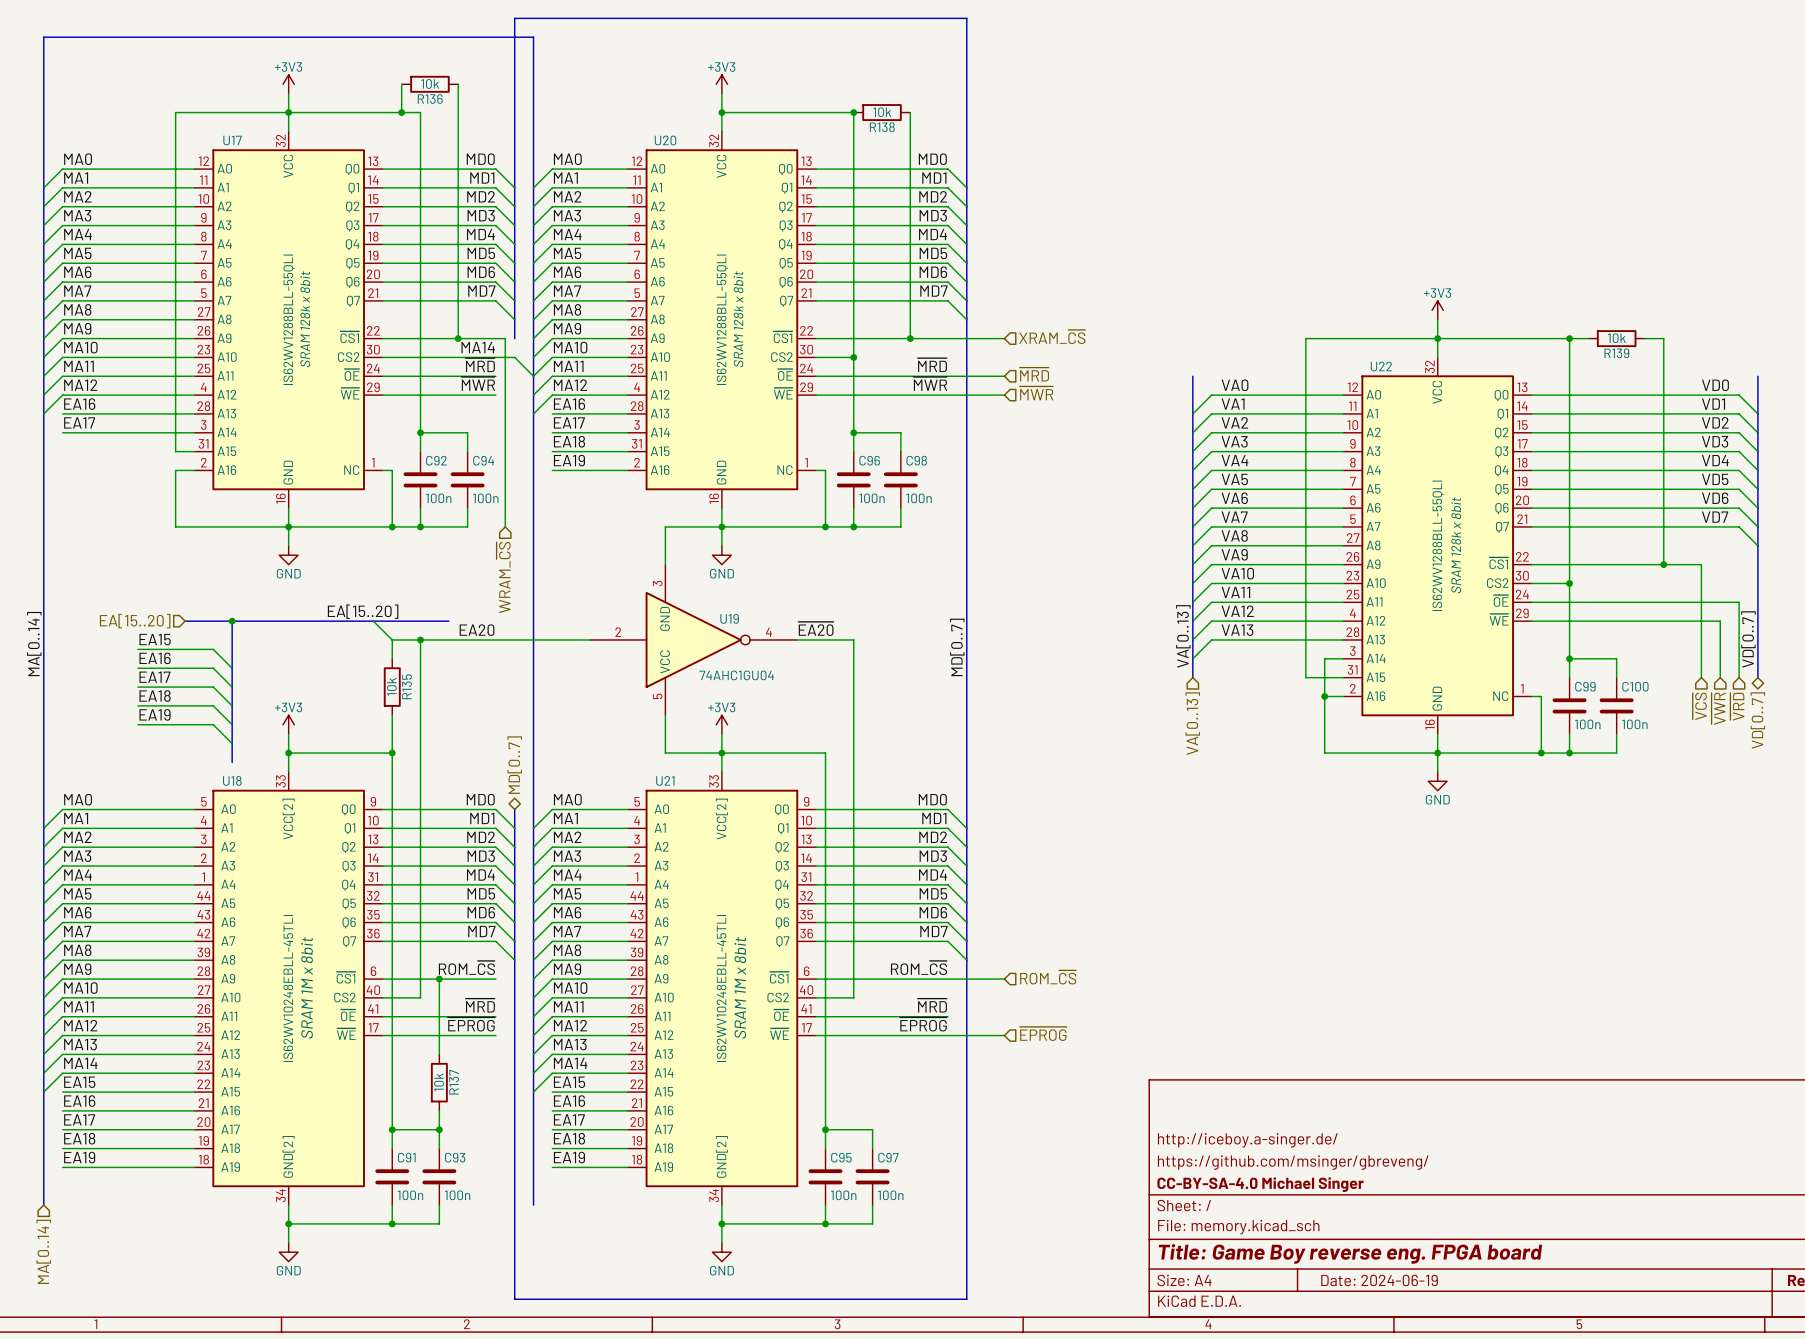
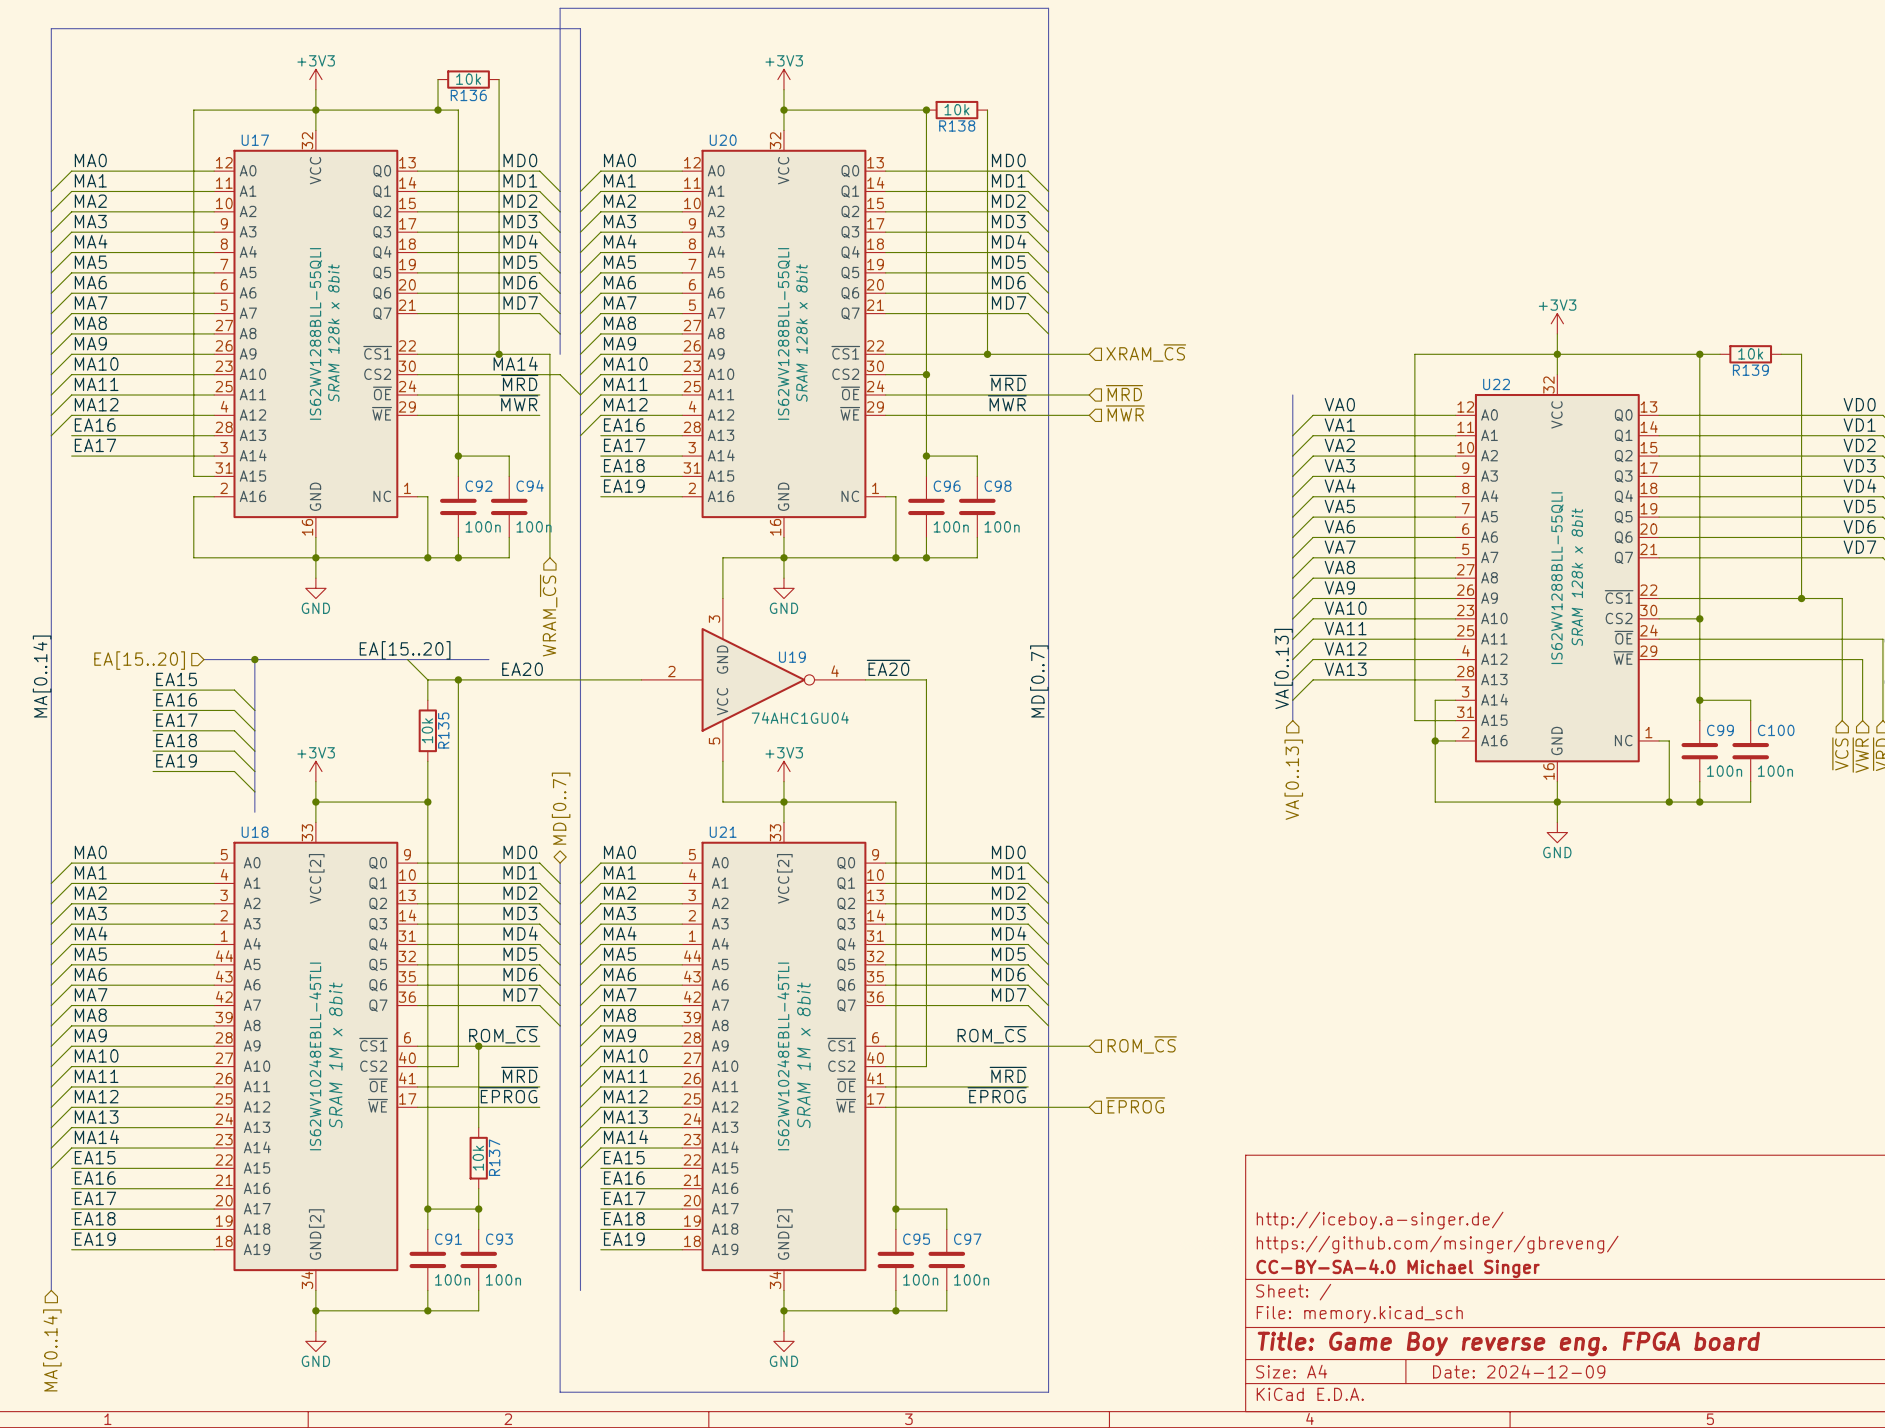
title block: Date: 2024-06-19 (1379, 1280) -> Date: 2024-12-09 (1519, 1371)

